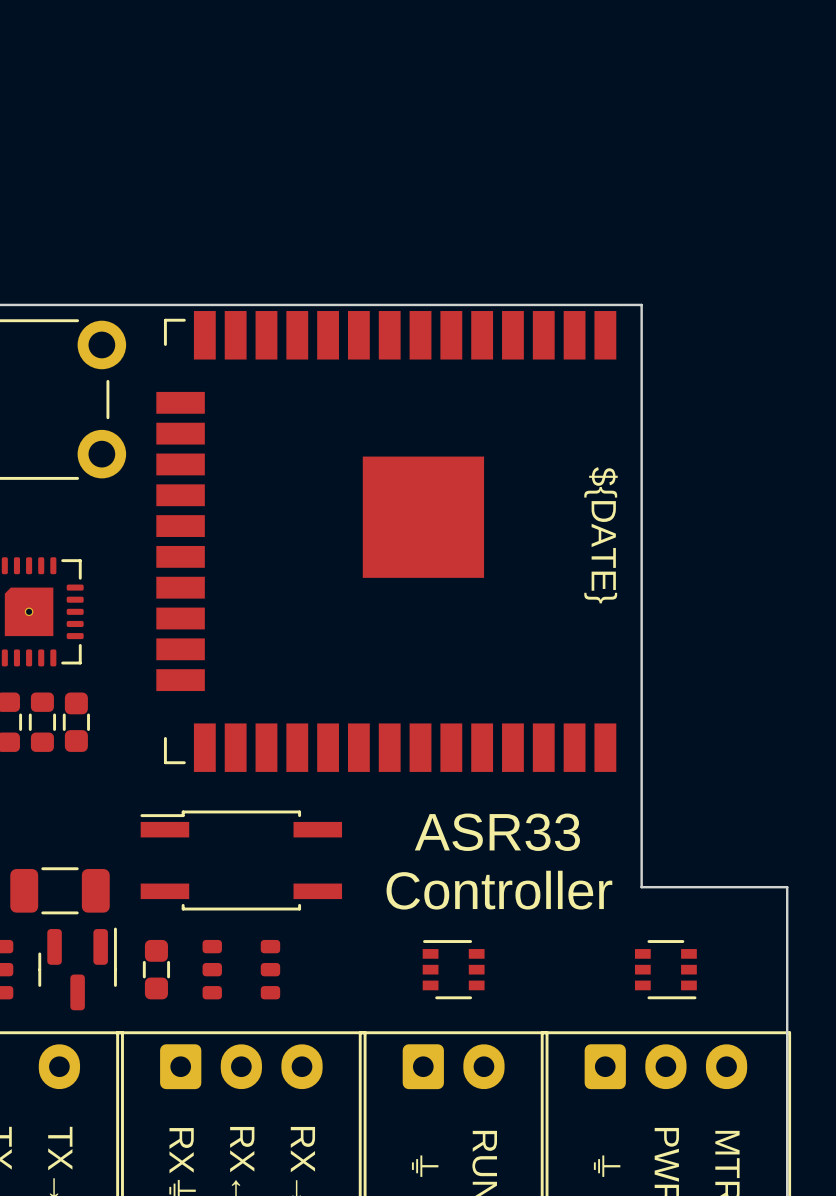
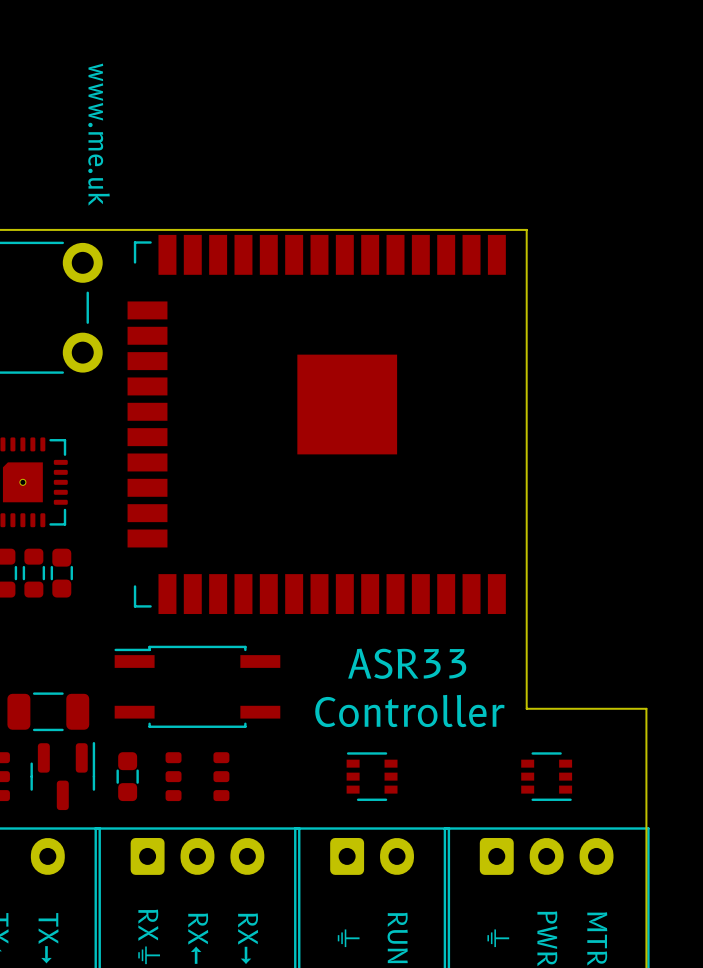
text: none -> www.me.uk (99, 134)
text: ${DATE} (601, 535) -> none

